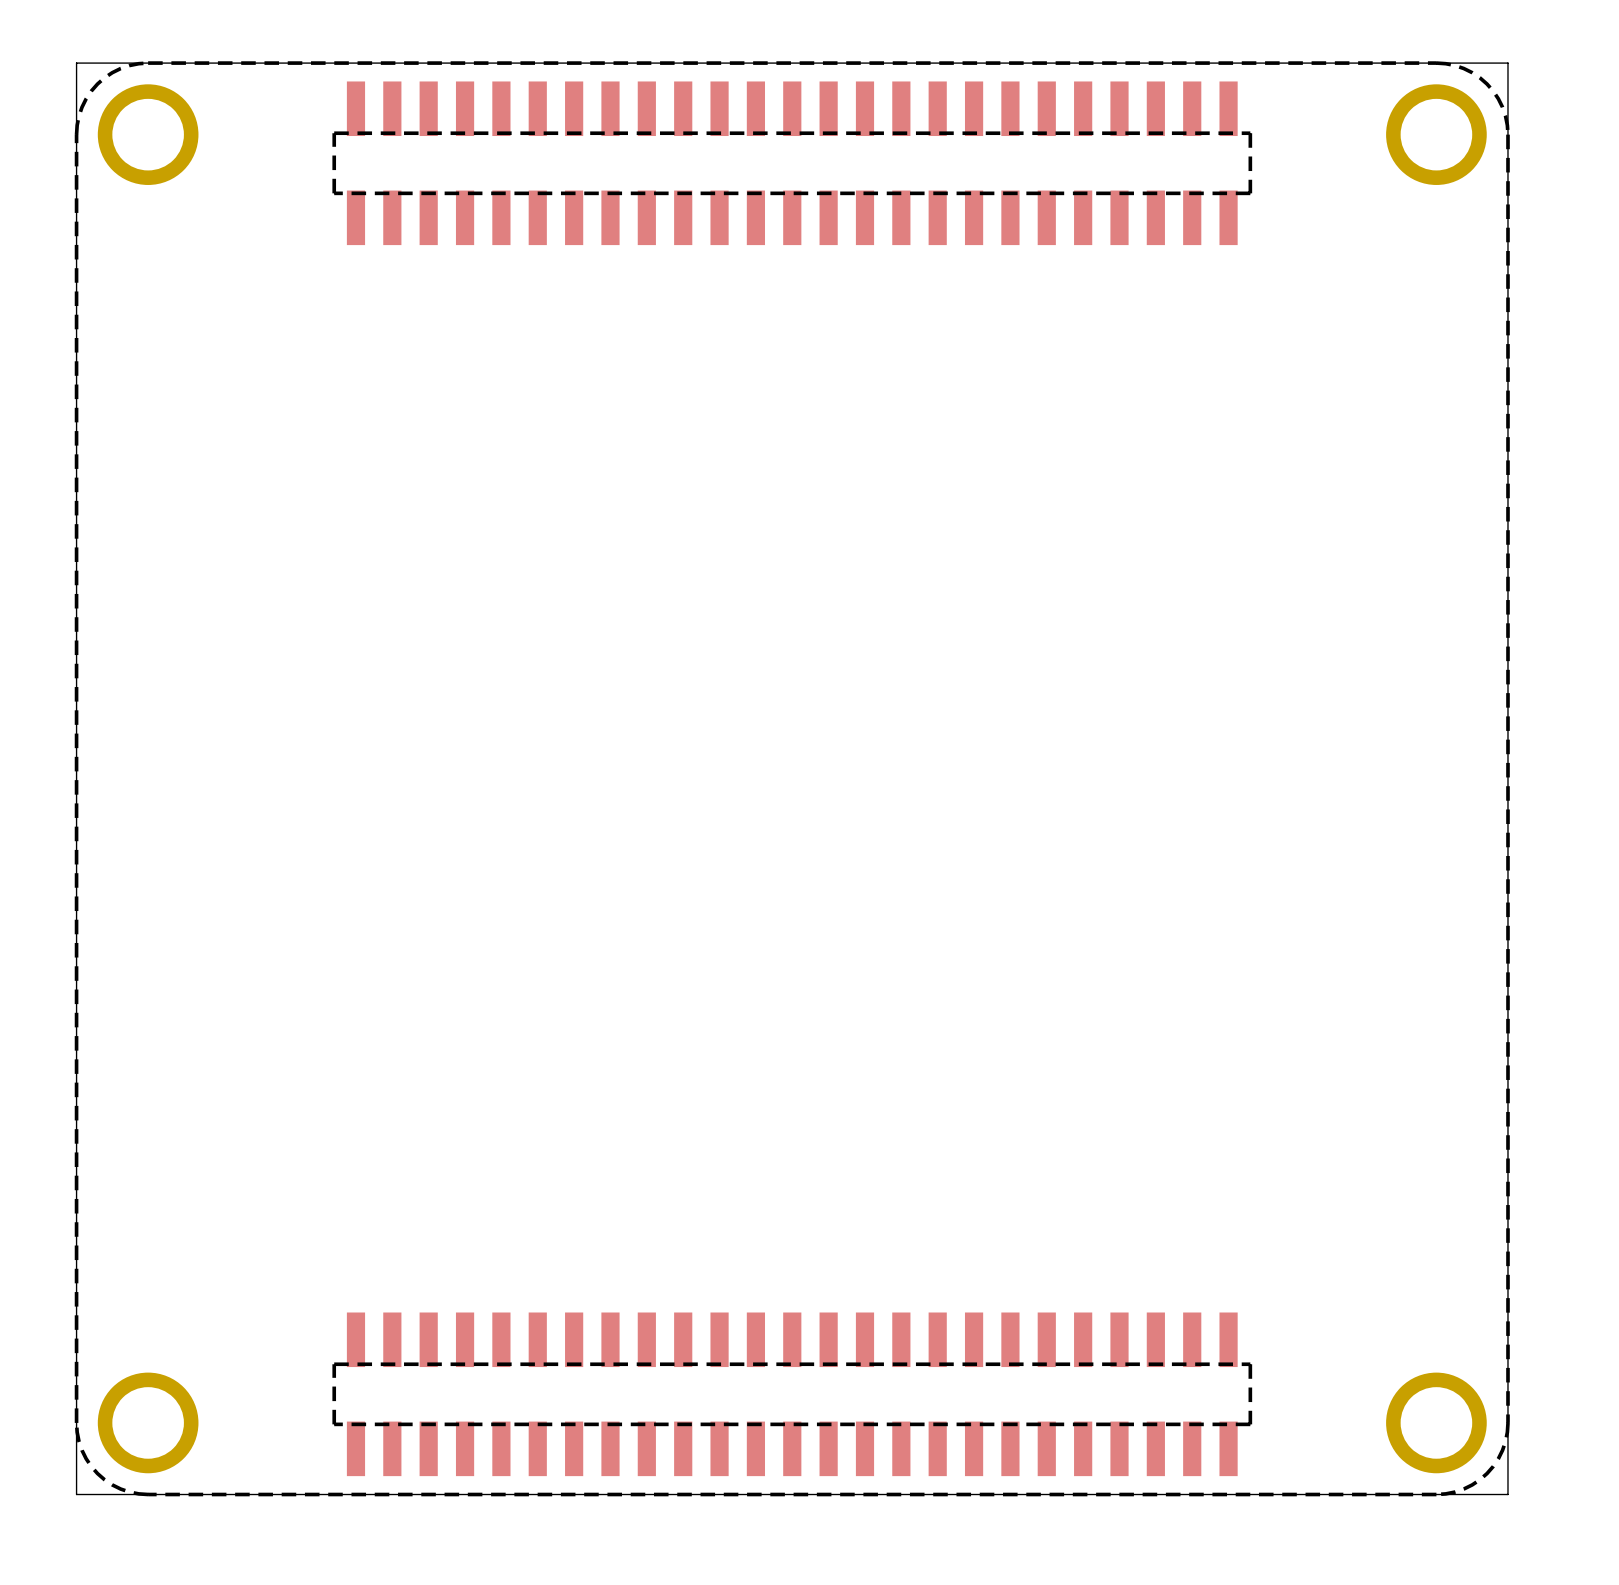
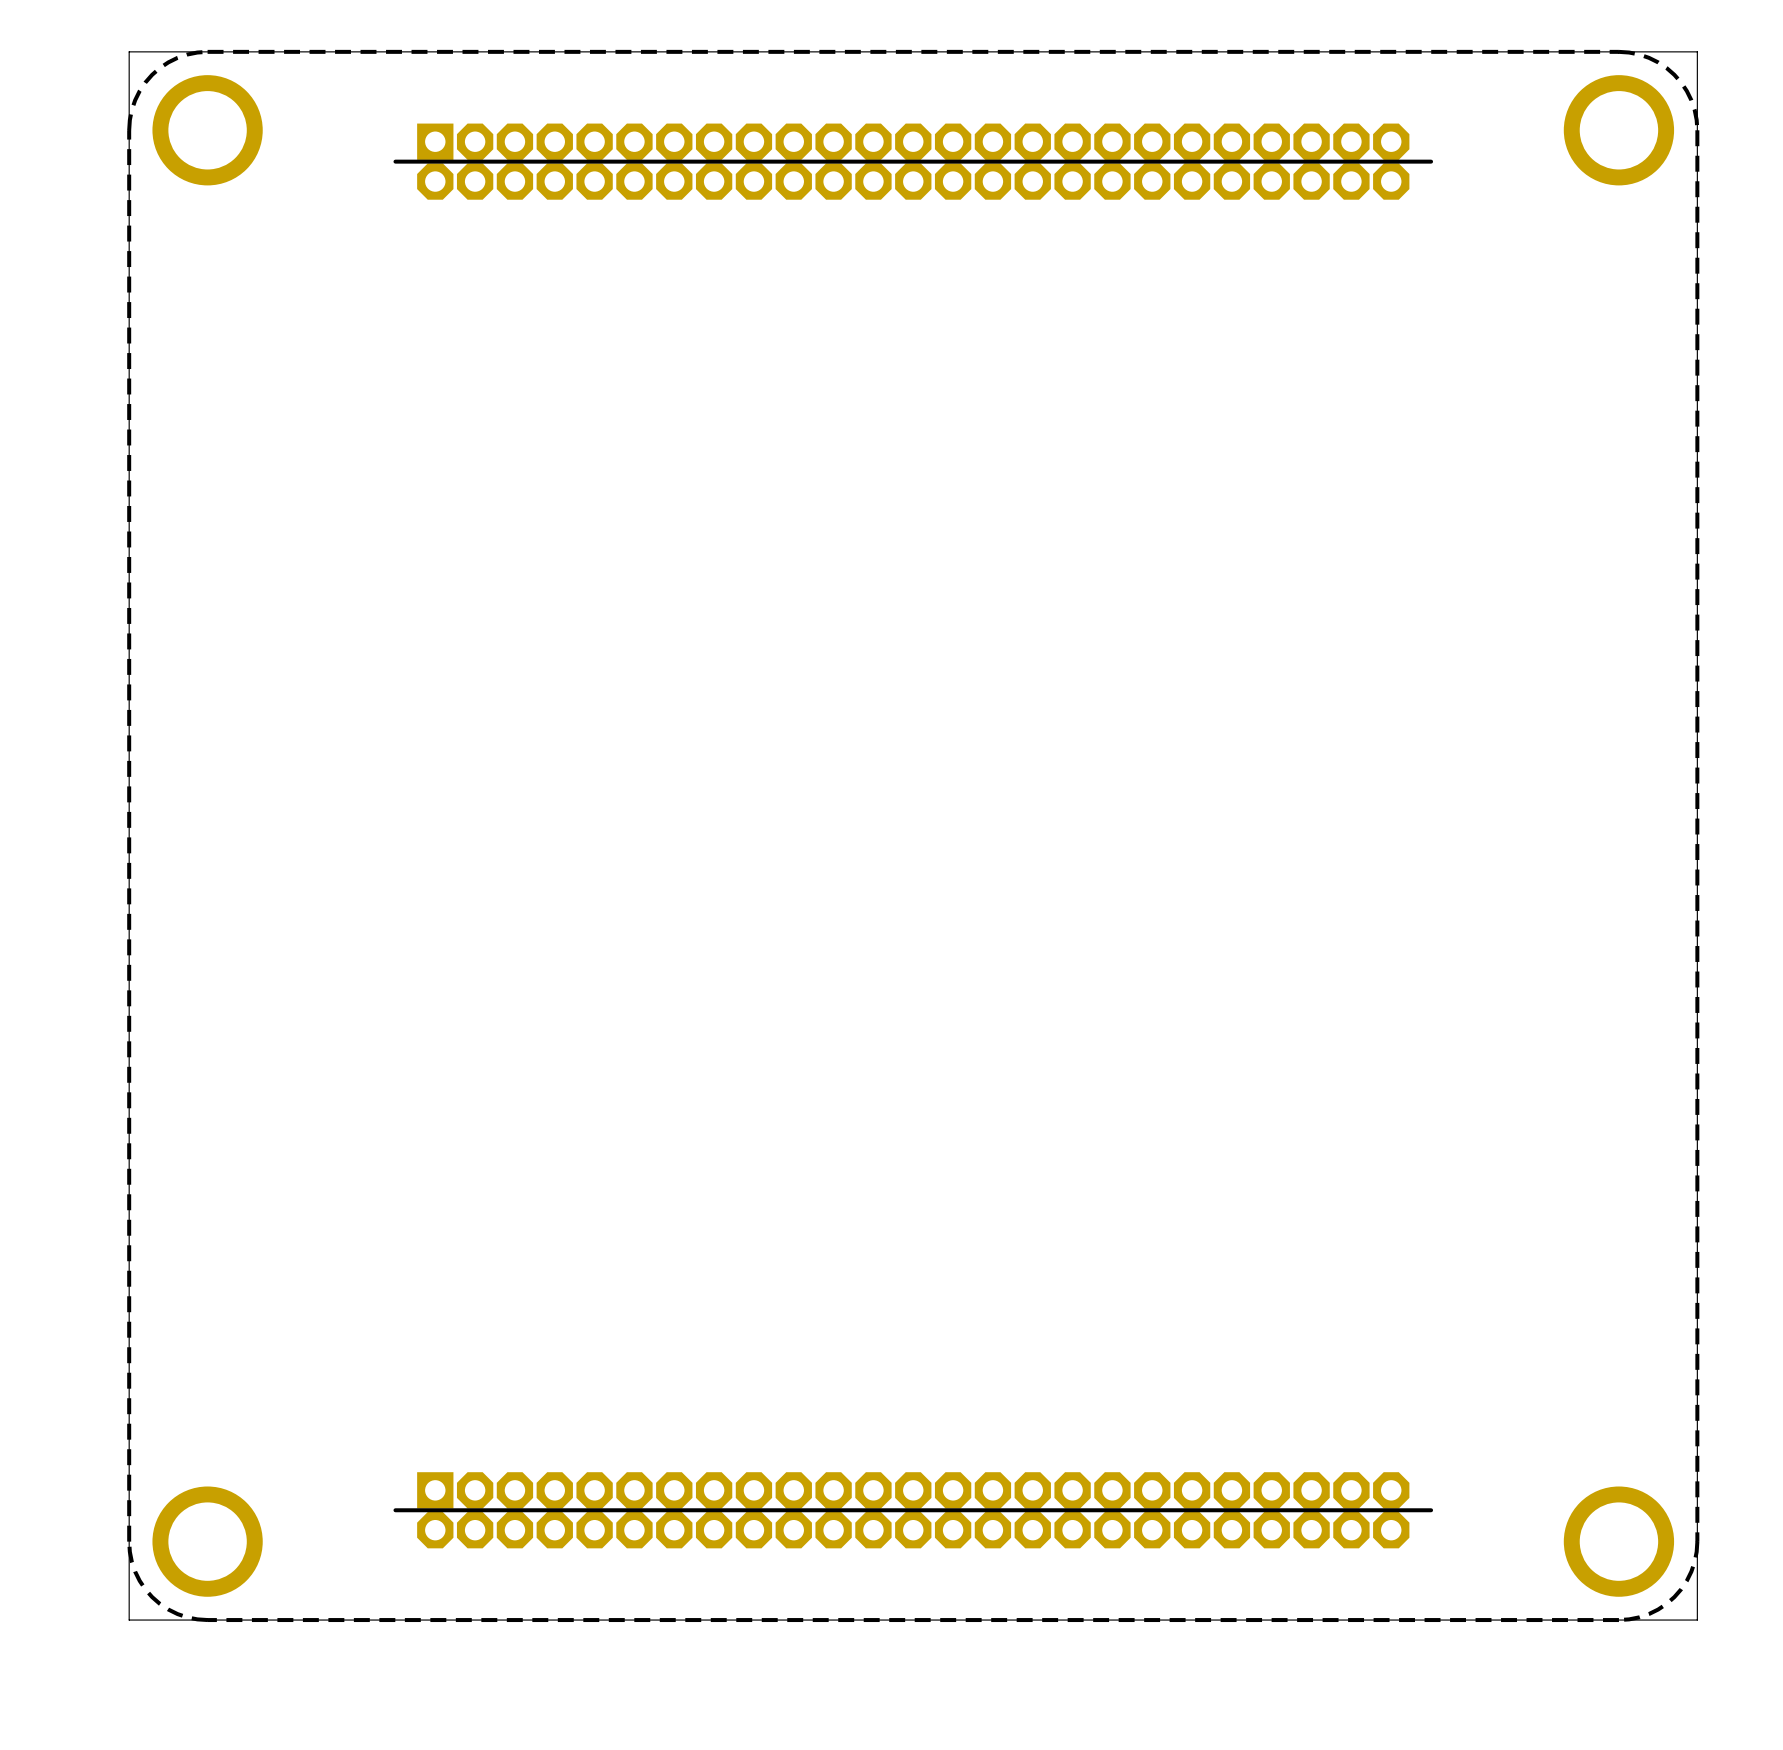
part footprint: [74, 61, 1510, 1497] -> [127, 49, 1700, 1623]

